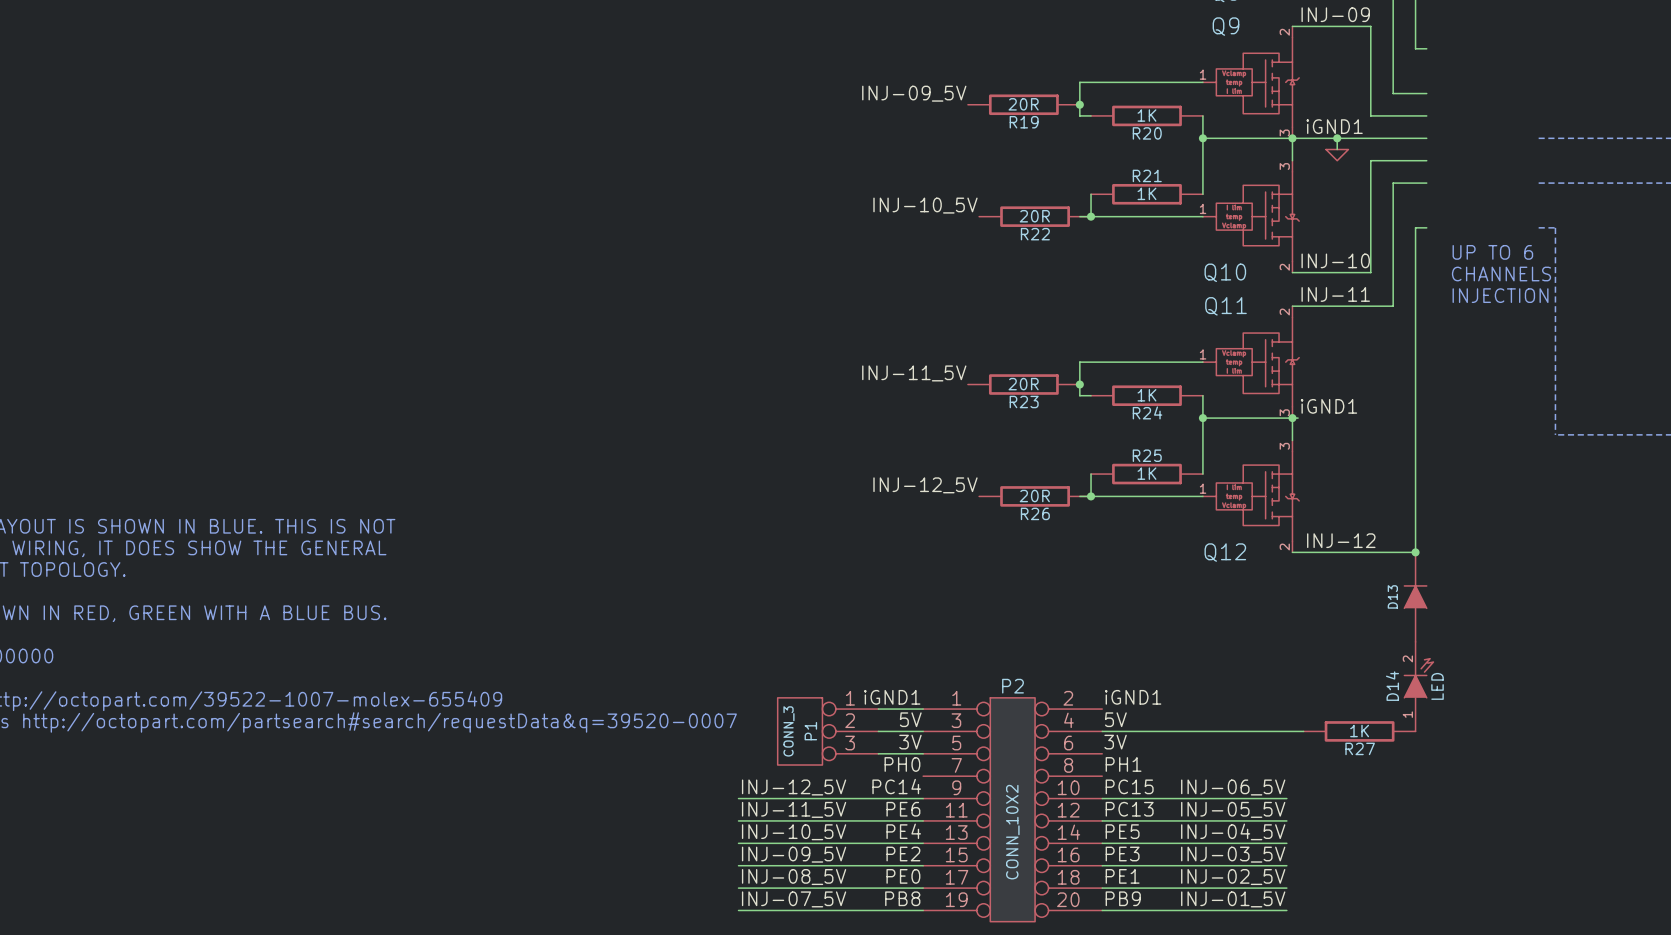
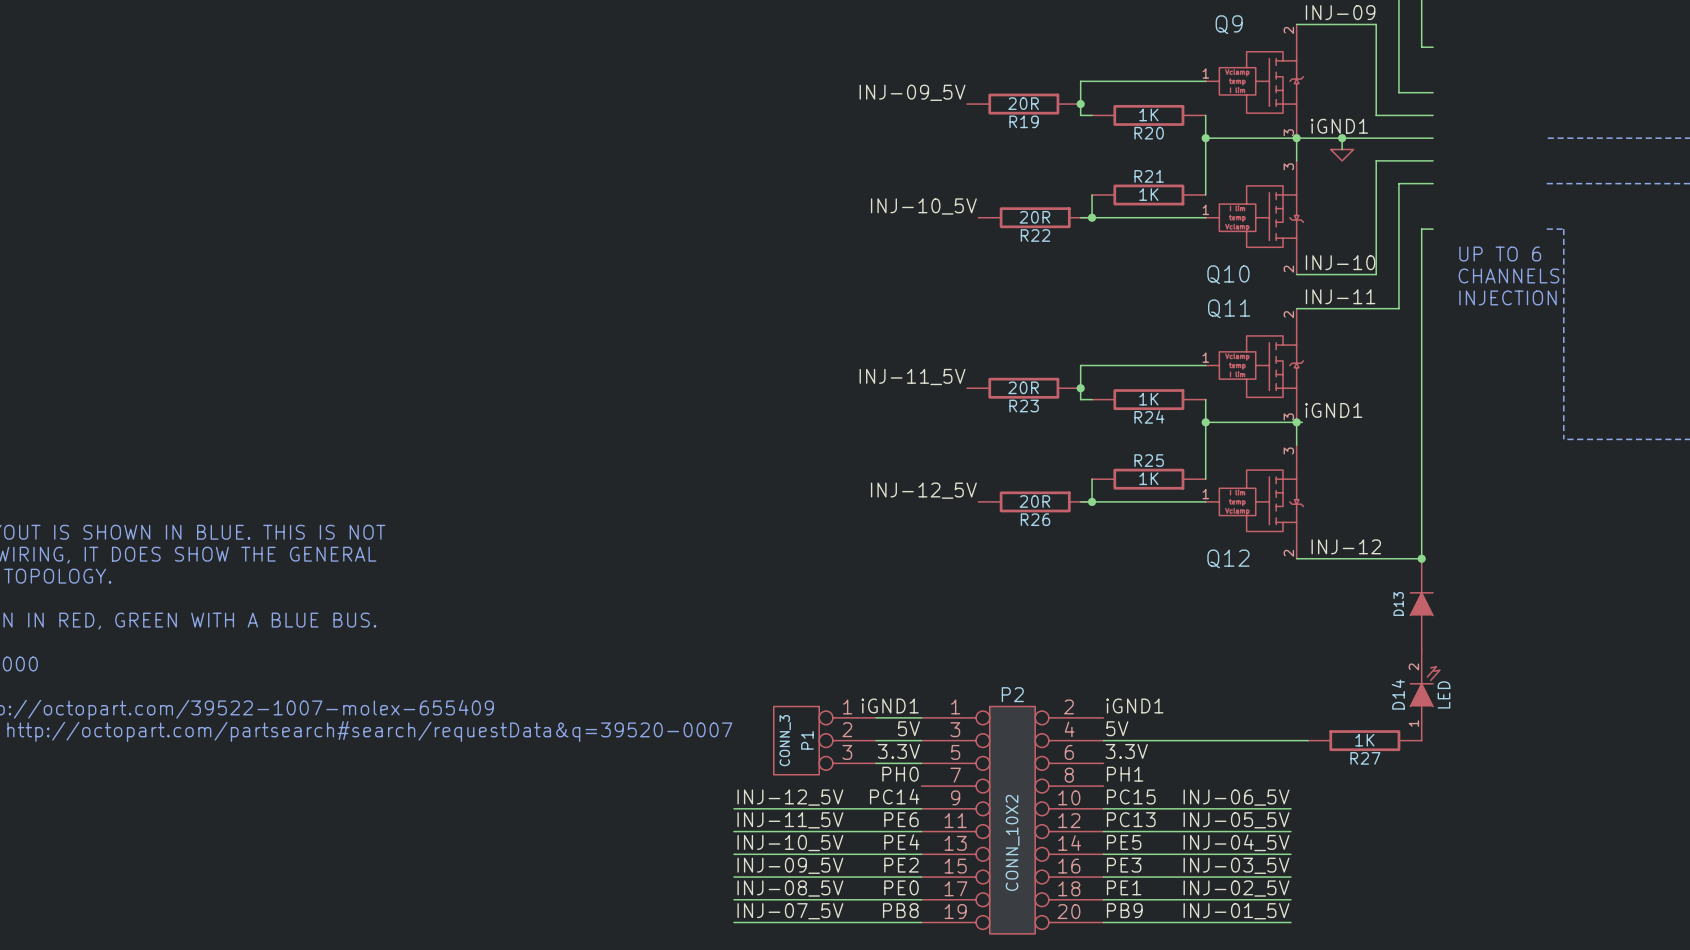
label: 3V (910, 742) -> 3.3V (898, 751)
label: 3V (1115, 742) -> 3.3V (1126, 751)

